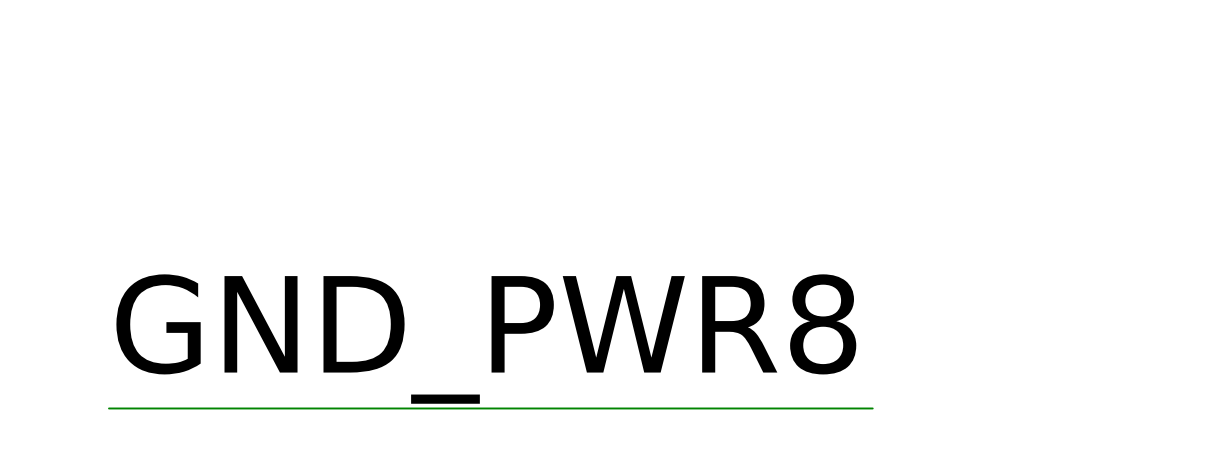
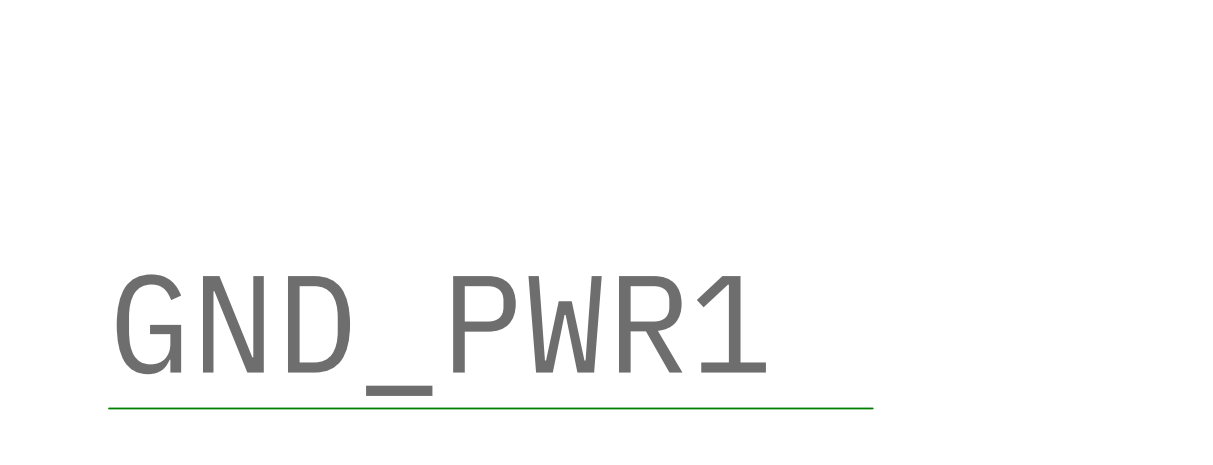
label: GND_PWR8 (486, 339) -> GND_PWR1 (441, 335)

